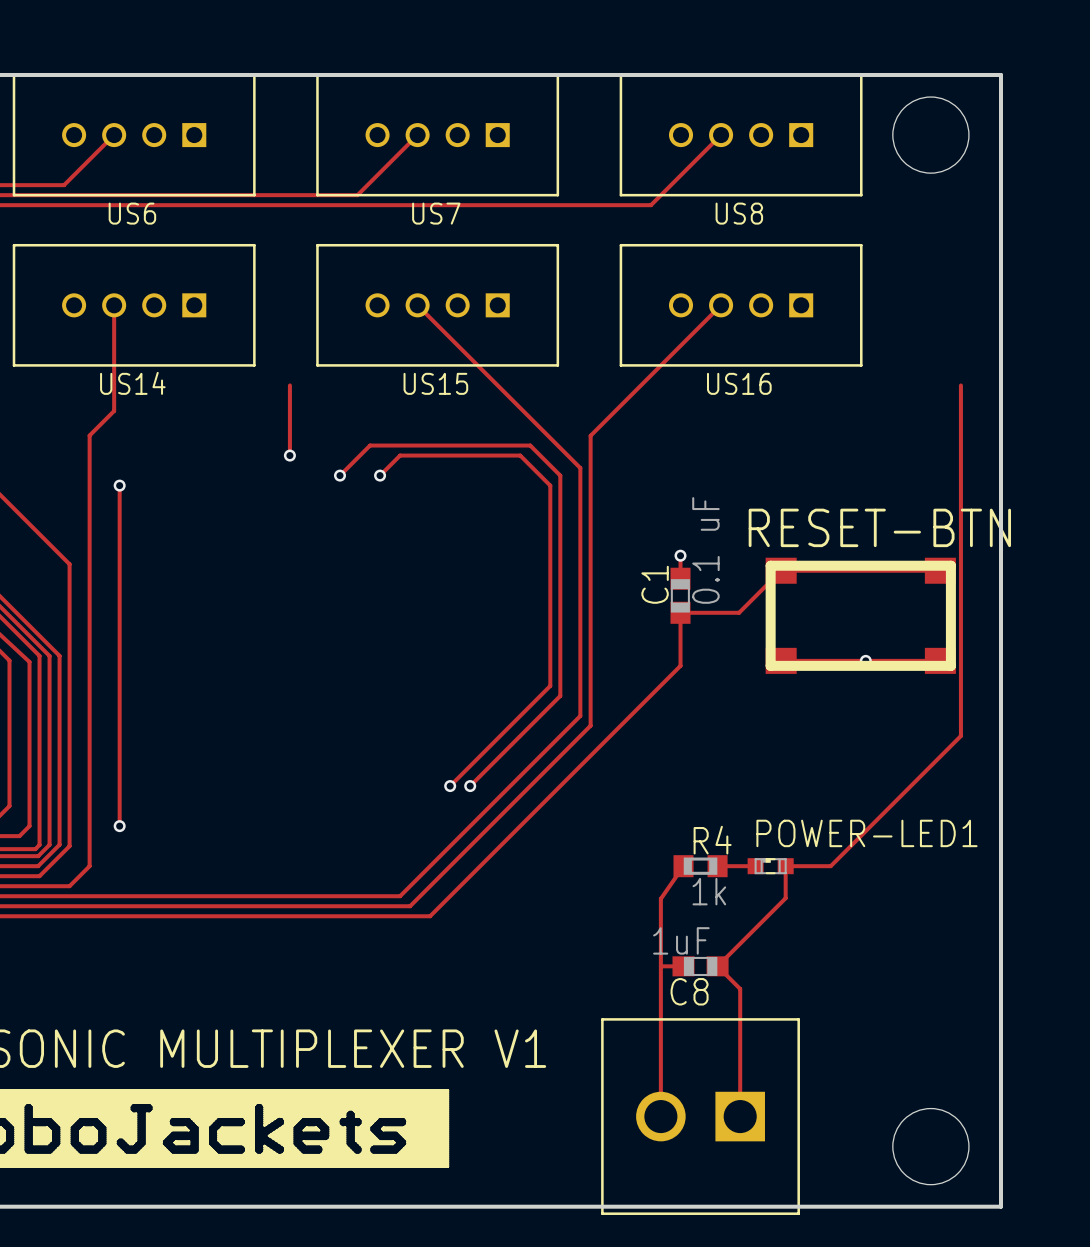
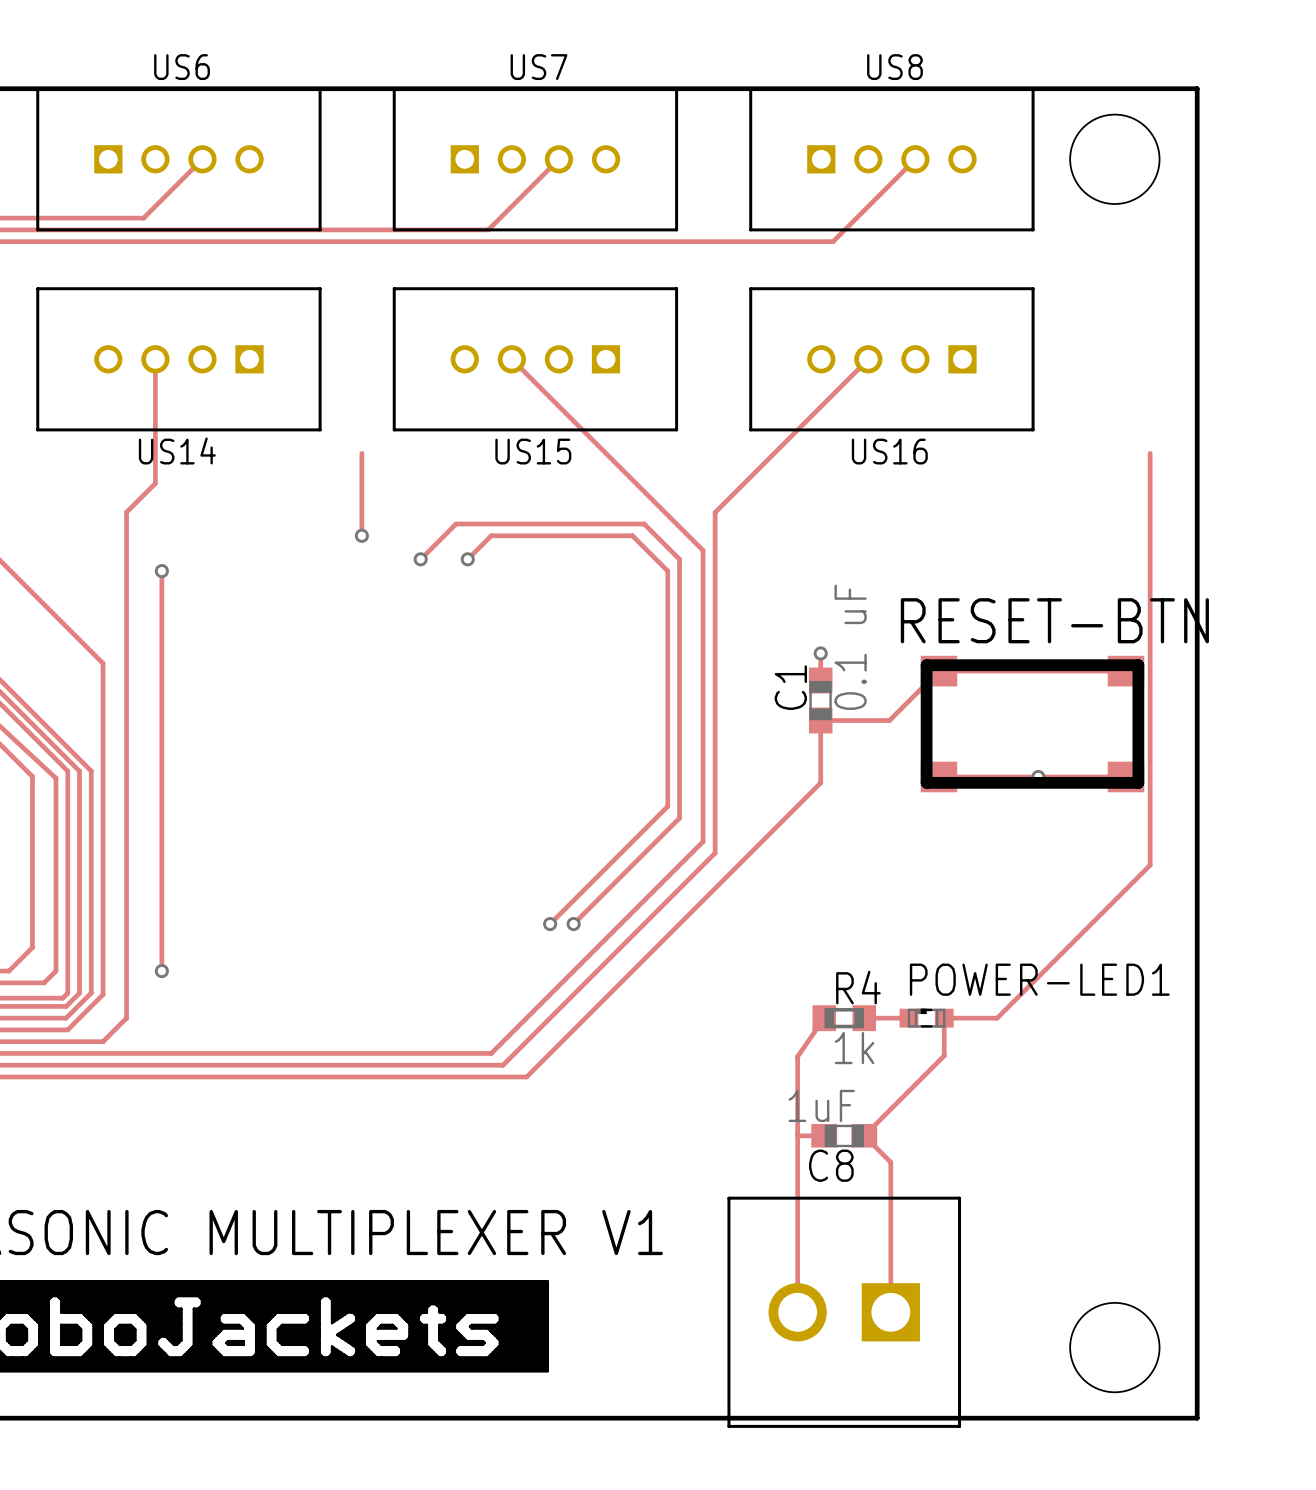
track: (114, 135) (64, 185) -> (202, 159) (143, 218) (96, 218)
US6 rotation: 0° (134, 135) -> 180° (178, 159)
track: (417, 135) (357, 195) -> (558, 159) (488, 229) (441, 229)
US7 rotation: 0° (437, 135) -> 180° (535, 159)
track: (721, 135) (650, 205) -> (915, 159) (833, 241) (786, 241)
US8 rotation: 0° (741, 135) -> 180° (891, 159)

